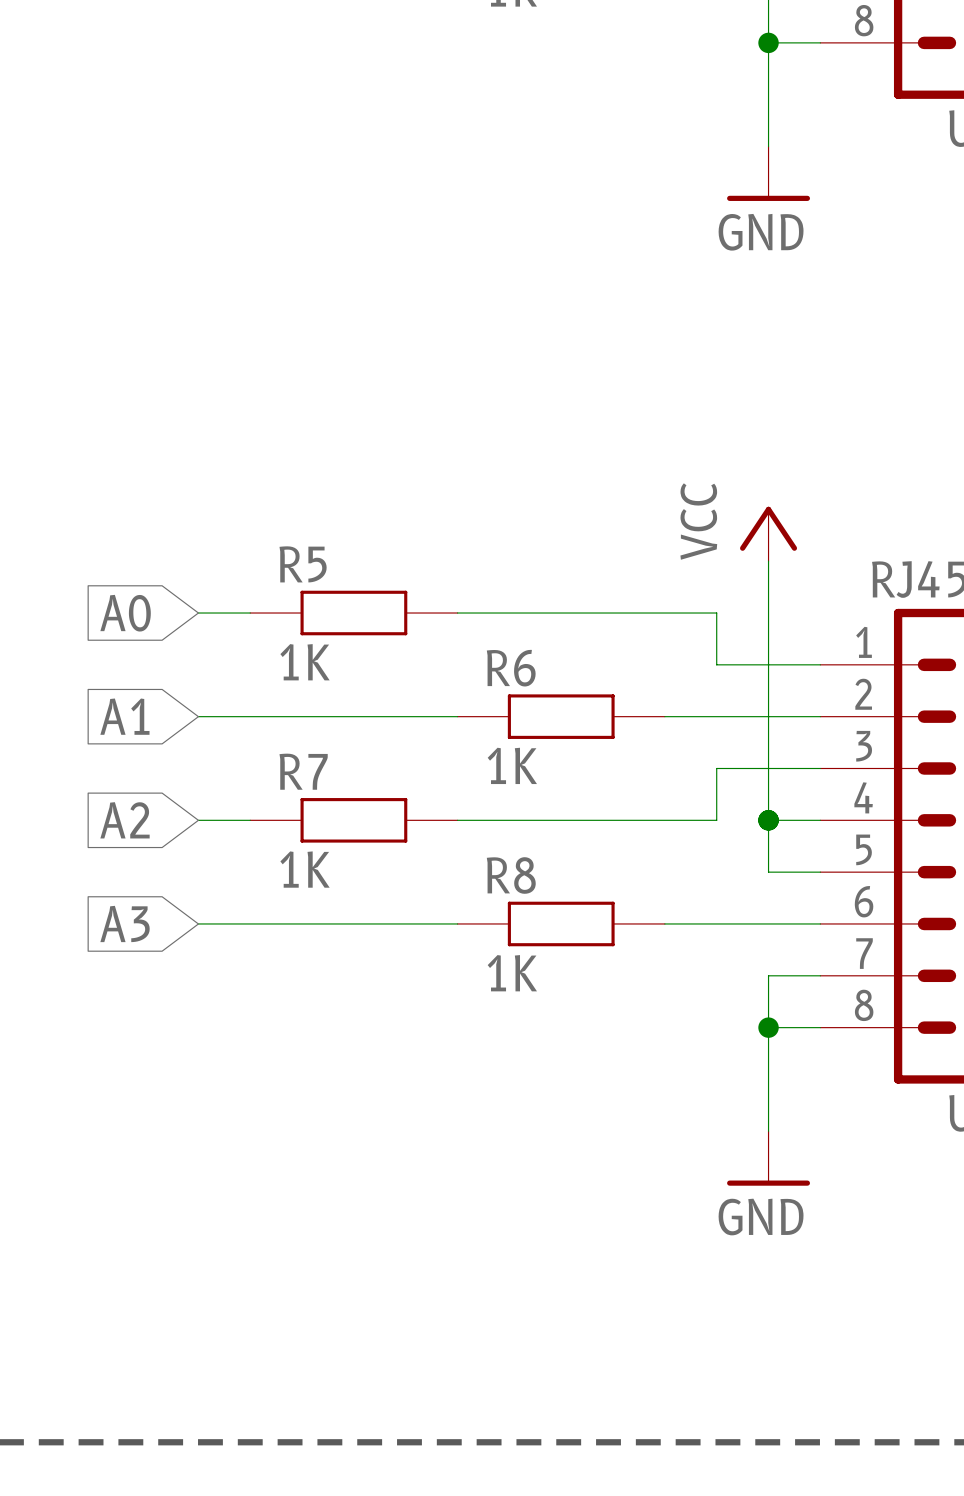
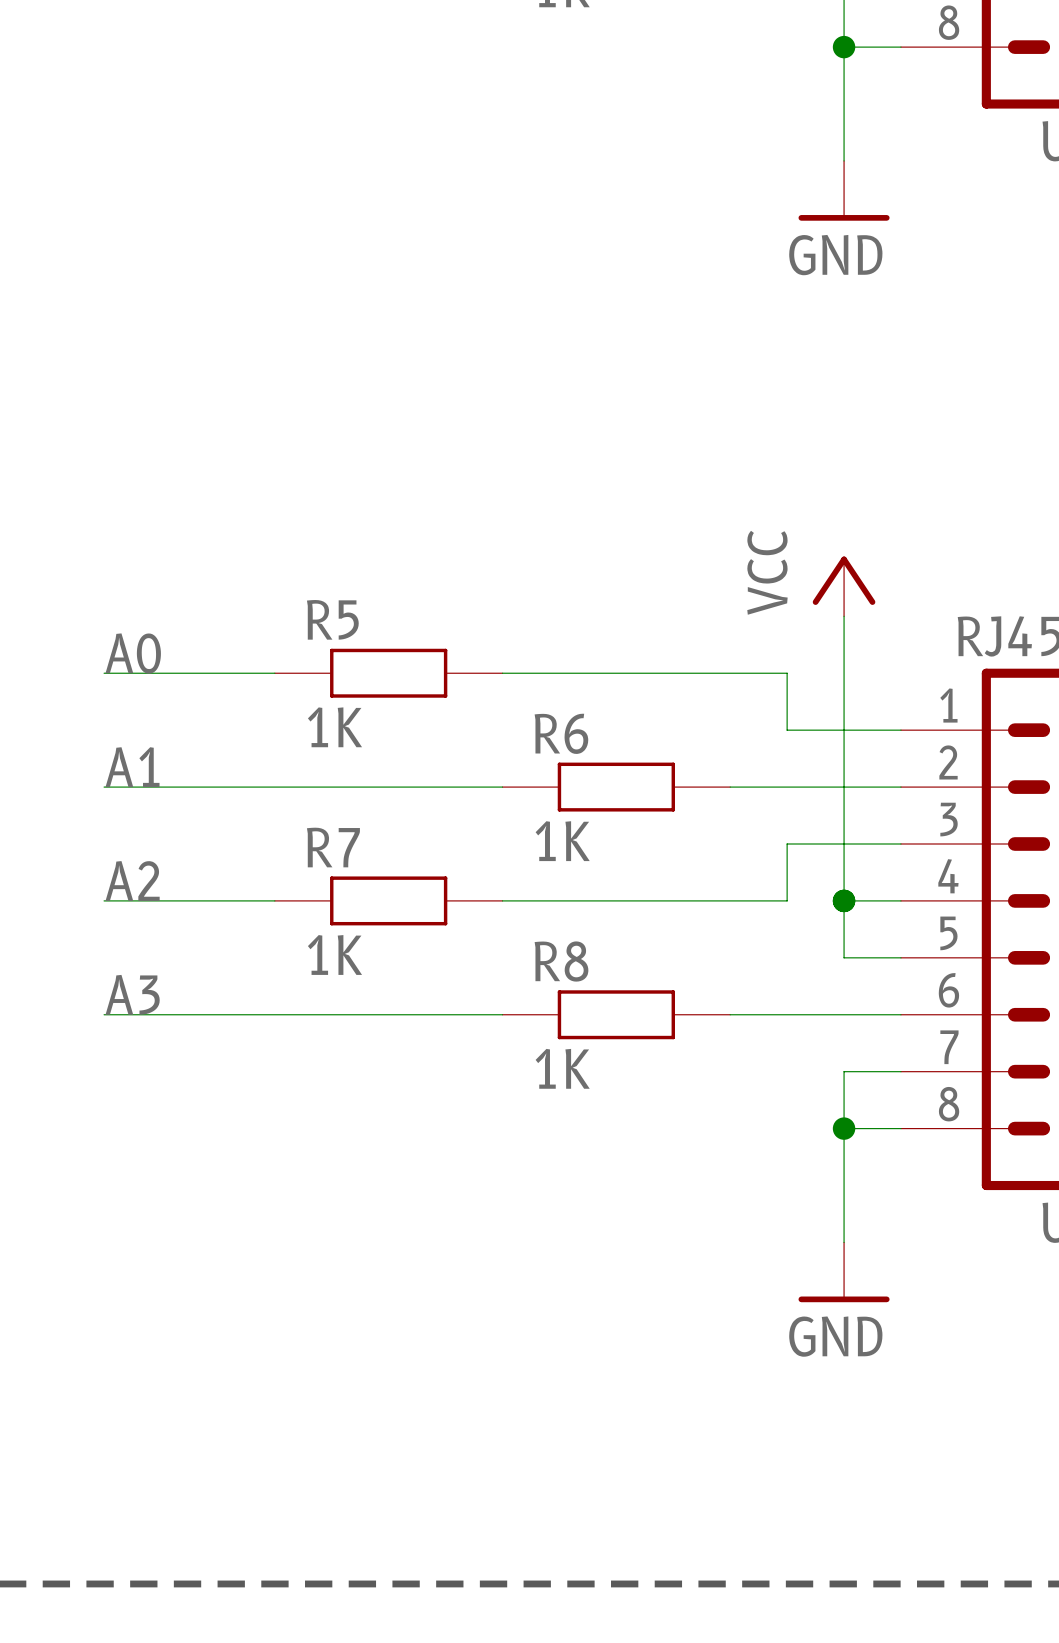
label: none -> A0 (133, 653)
wire: none -> (104, 673) (217, 673)
global label: A0 (125, 613) -> none
label: none -> A1 (132, 767)
wire: none -> (104, 787) (217, 787)
global label: A1 (124, 716) -> none
label: none -> A2 (132, 880)
wire: none -> (104, 900) (217, 900)
global label: A2 (125, 820) -> none
label: none -> A3 (132, 994)
wire: none -> (104, 1014) (217, 1014)
global label: A3 (125, 923) -> none

